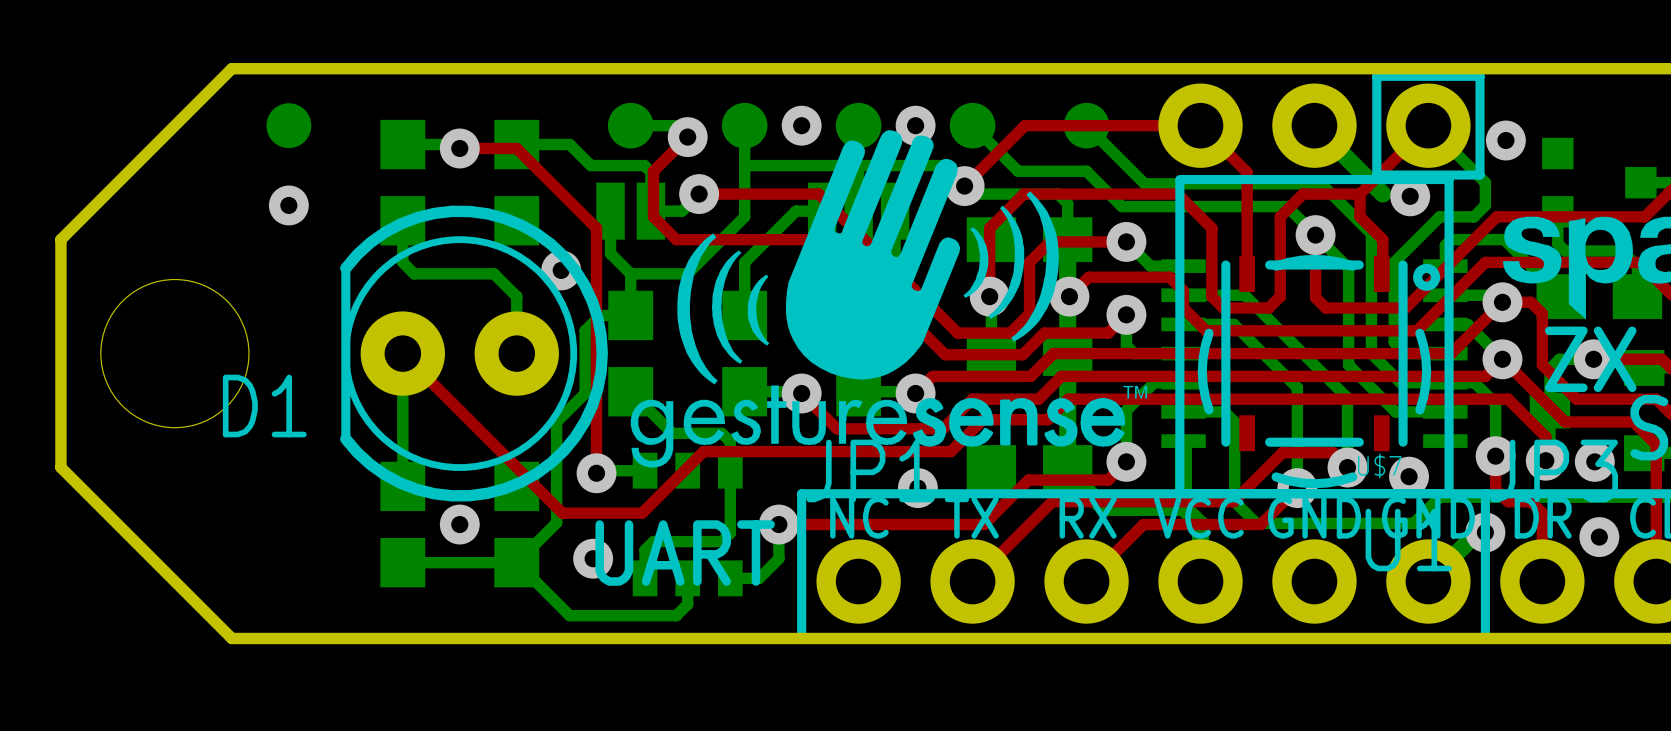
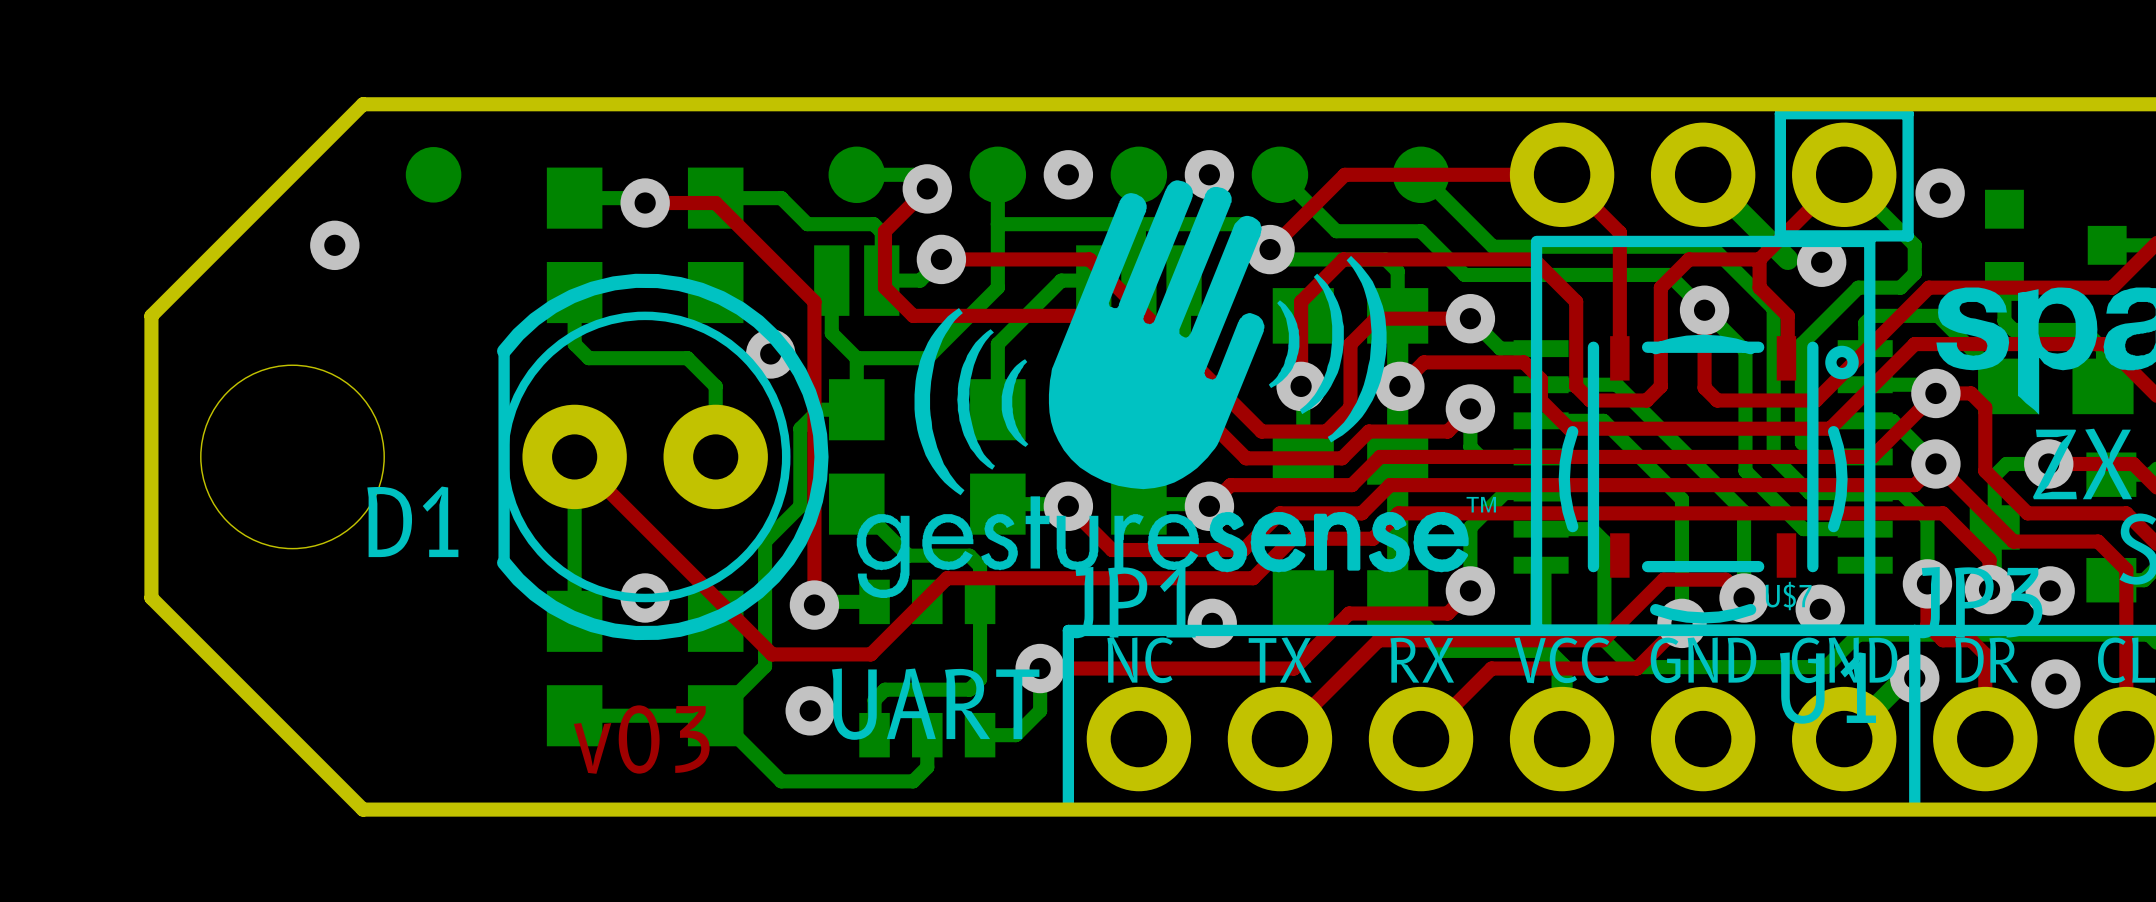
via position: (288, 205) -> (334, 245)
via position: (459, 524) -> (645, 597)
text: none -> v03 (641, 739)

